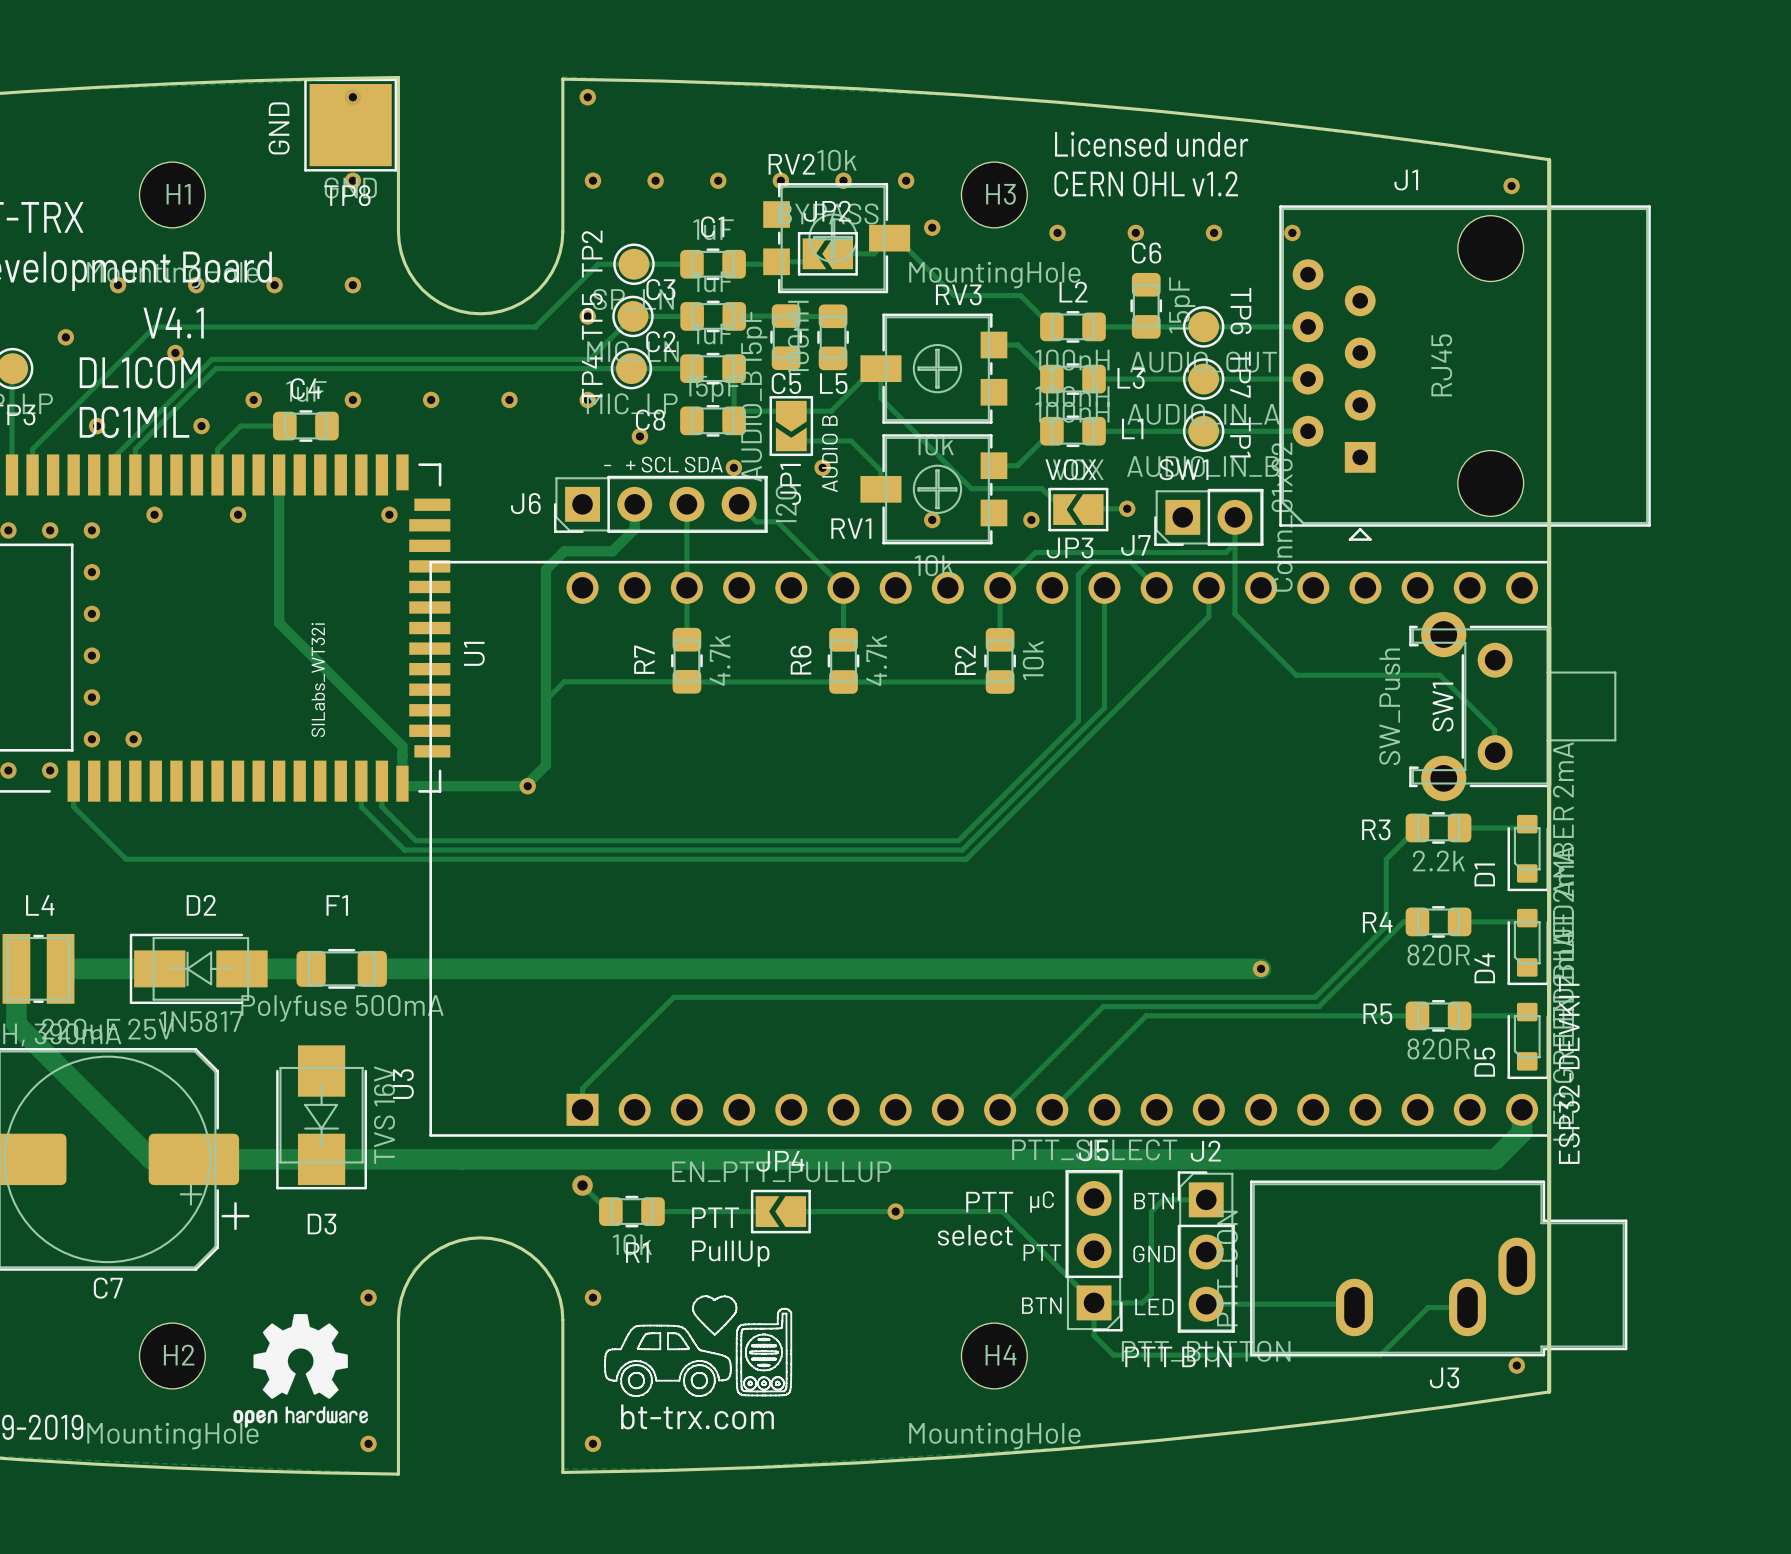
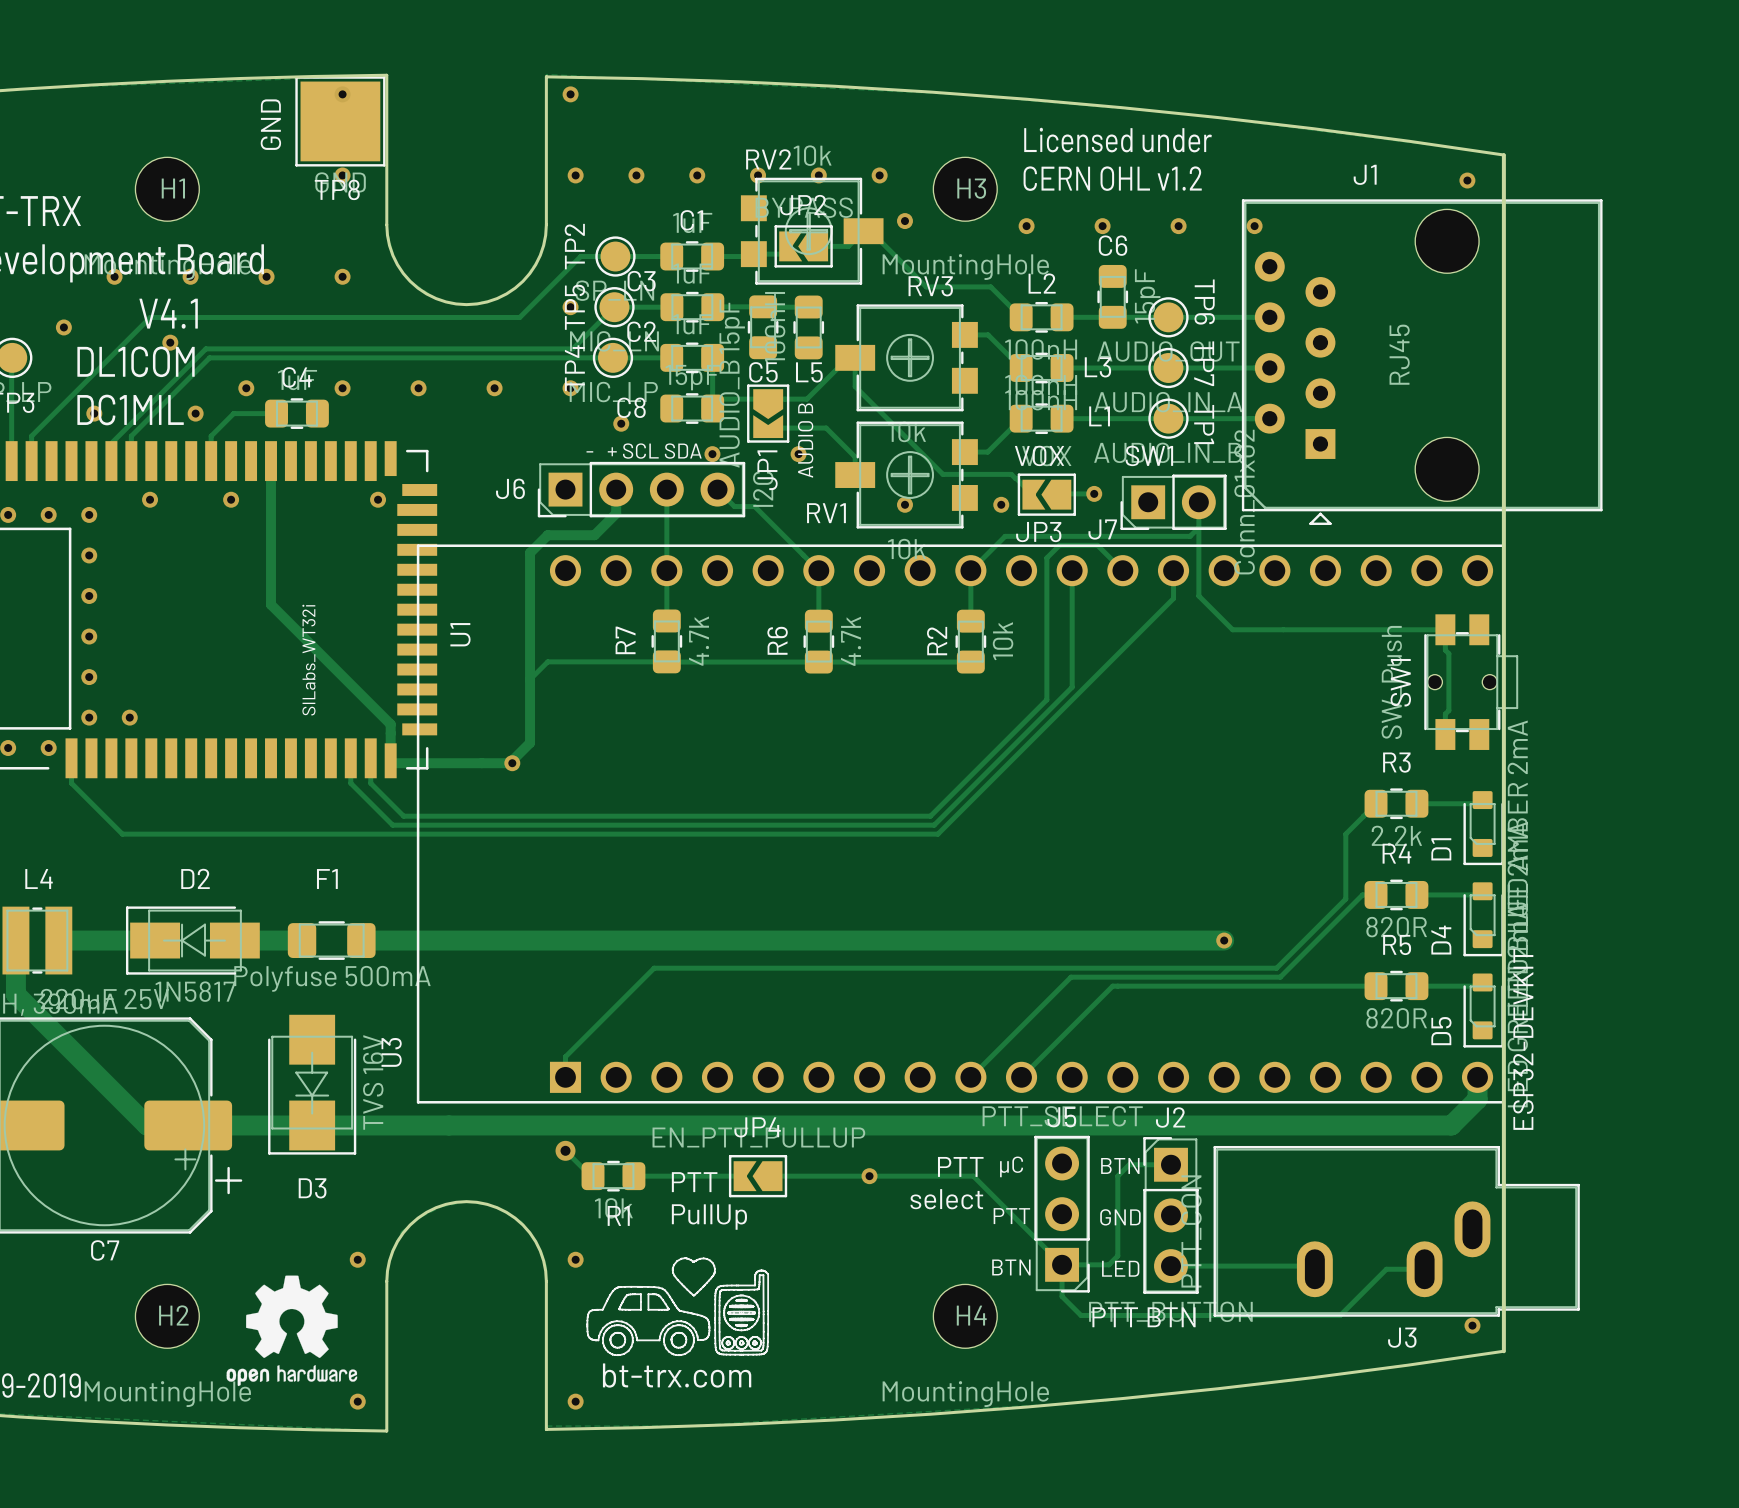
SW1 footprint: [1409, 611, 1617, 801] -> [1424, 614, 1519, 750]
track: (1269, 648) (1296, 675) (1439, 675) (1494, 730) (1494, 754) -> (1232, 629) (1440, 629)
track: none -> (1445, 629) (1445, 650) (1448, 653) (1448, 710) (1445, 714) (1445, 734)
SW1 value position: SW_Push (1389, 706) -> SW_Push (1391, 682)
R3 name position: R3 (1376, 829) -> R3 (1396, 762)
R4 name position: R4 (1377, 922) -> R4 (1396, 853)
R5 name position: R5 (1377, 1013) -> R5 (1397, 944)

